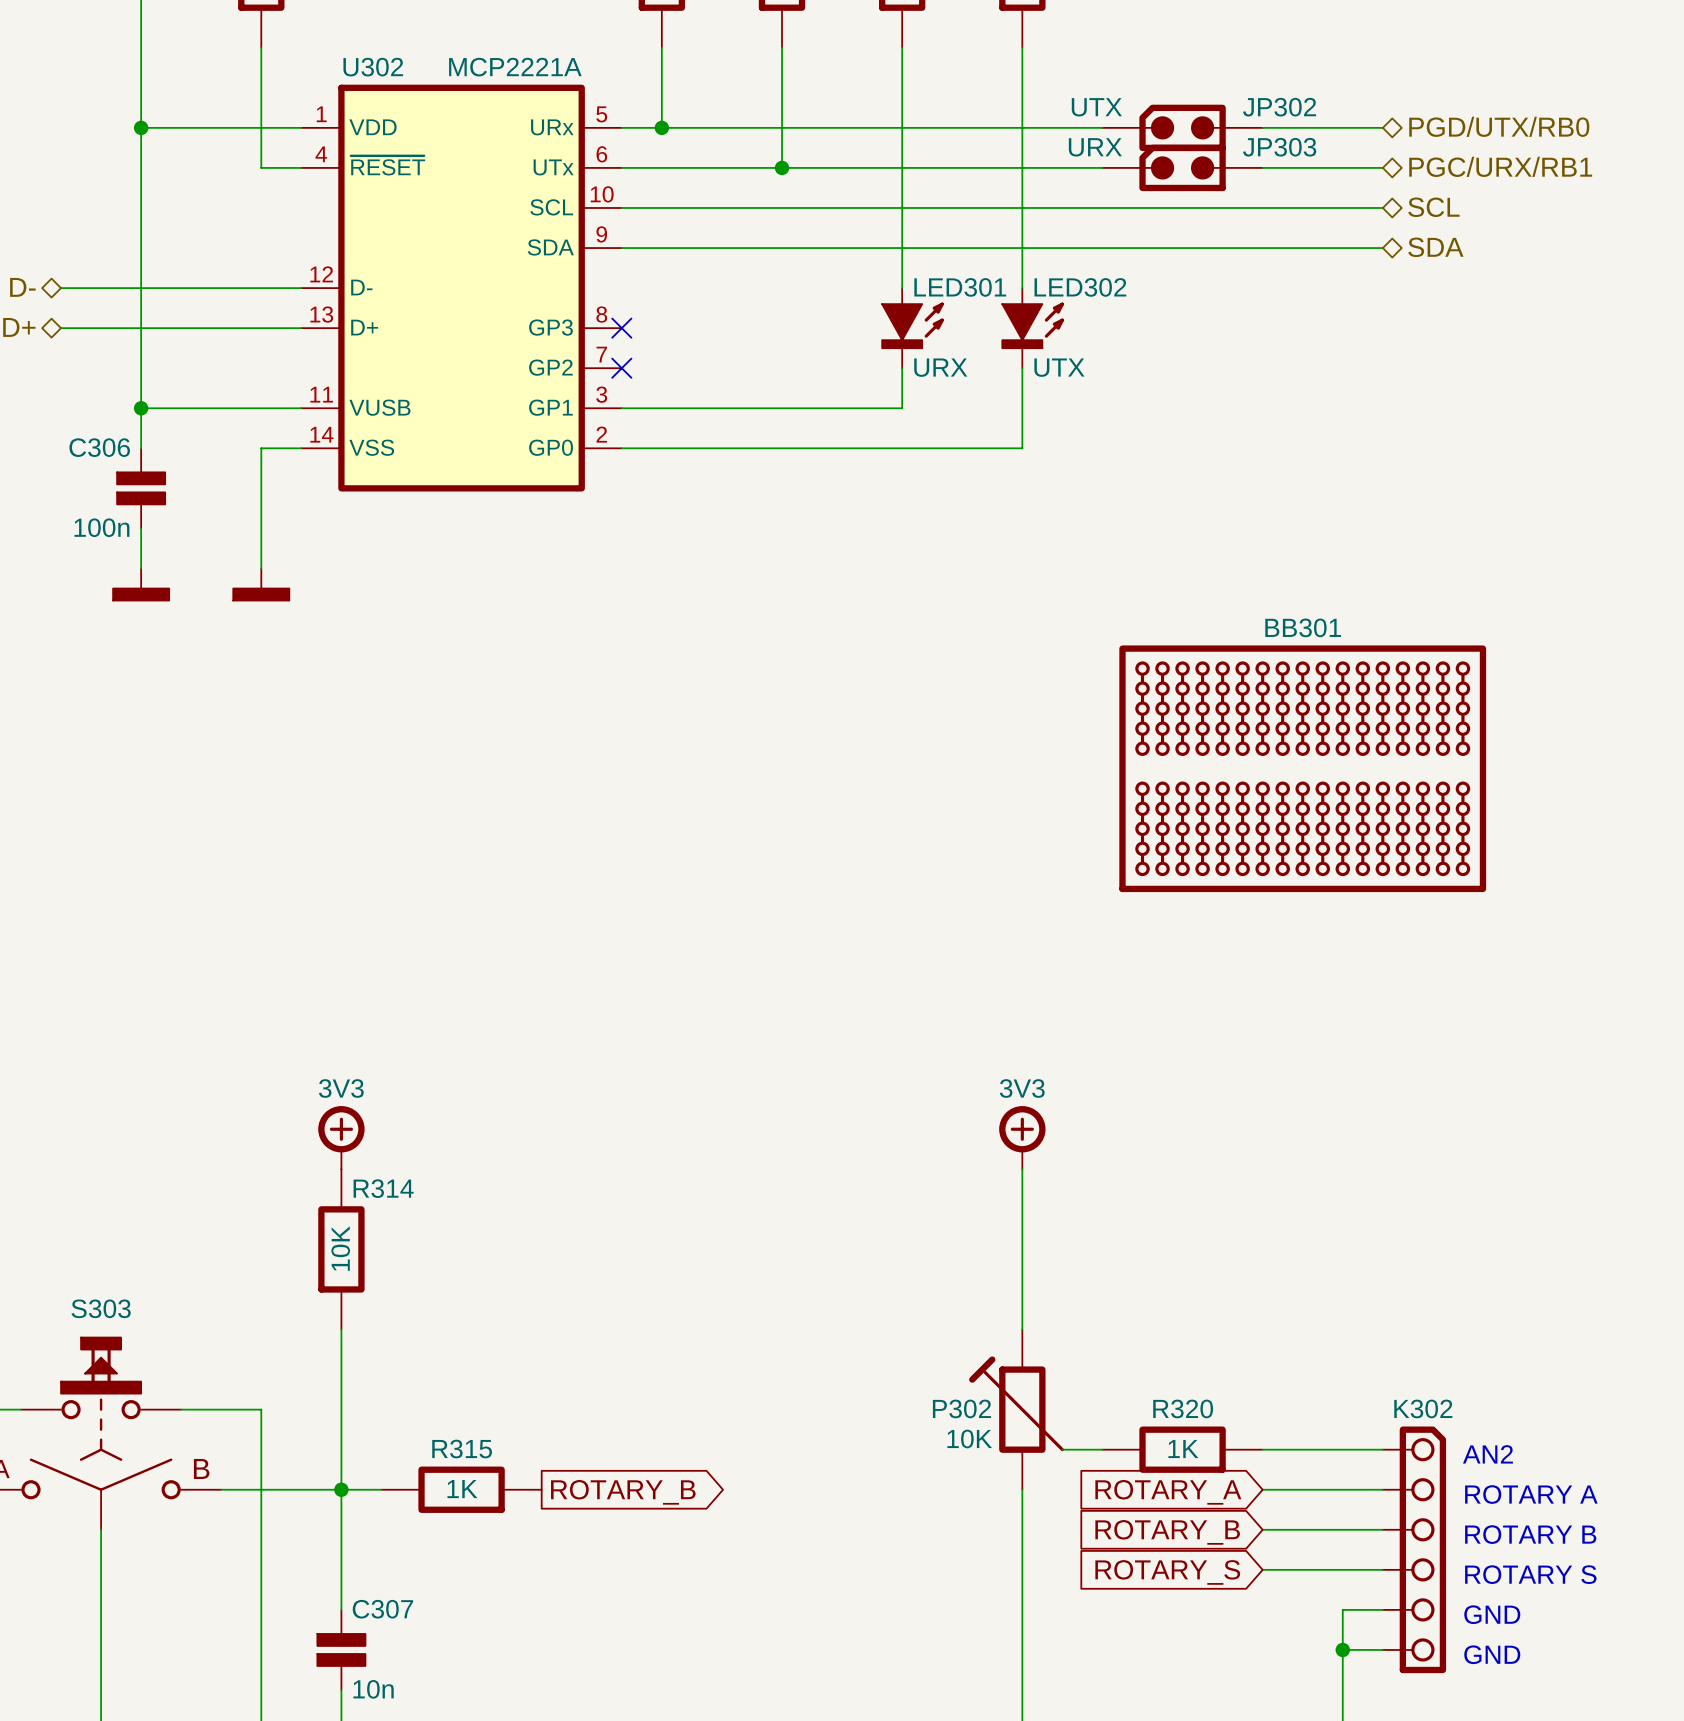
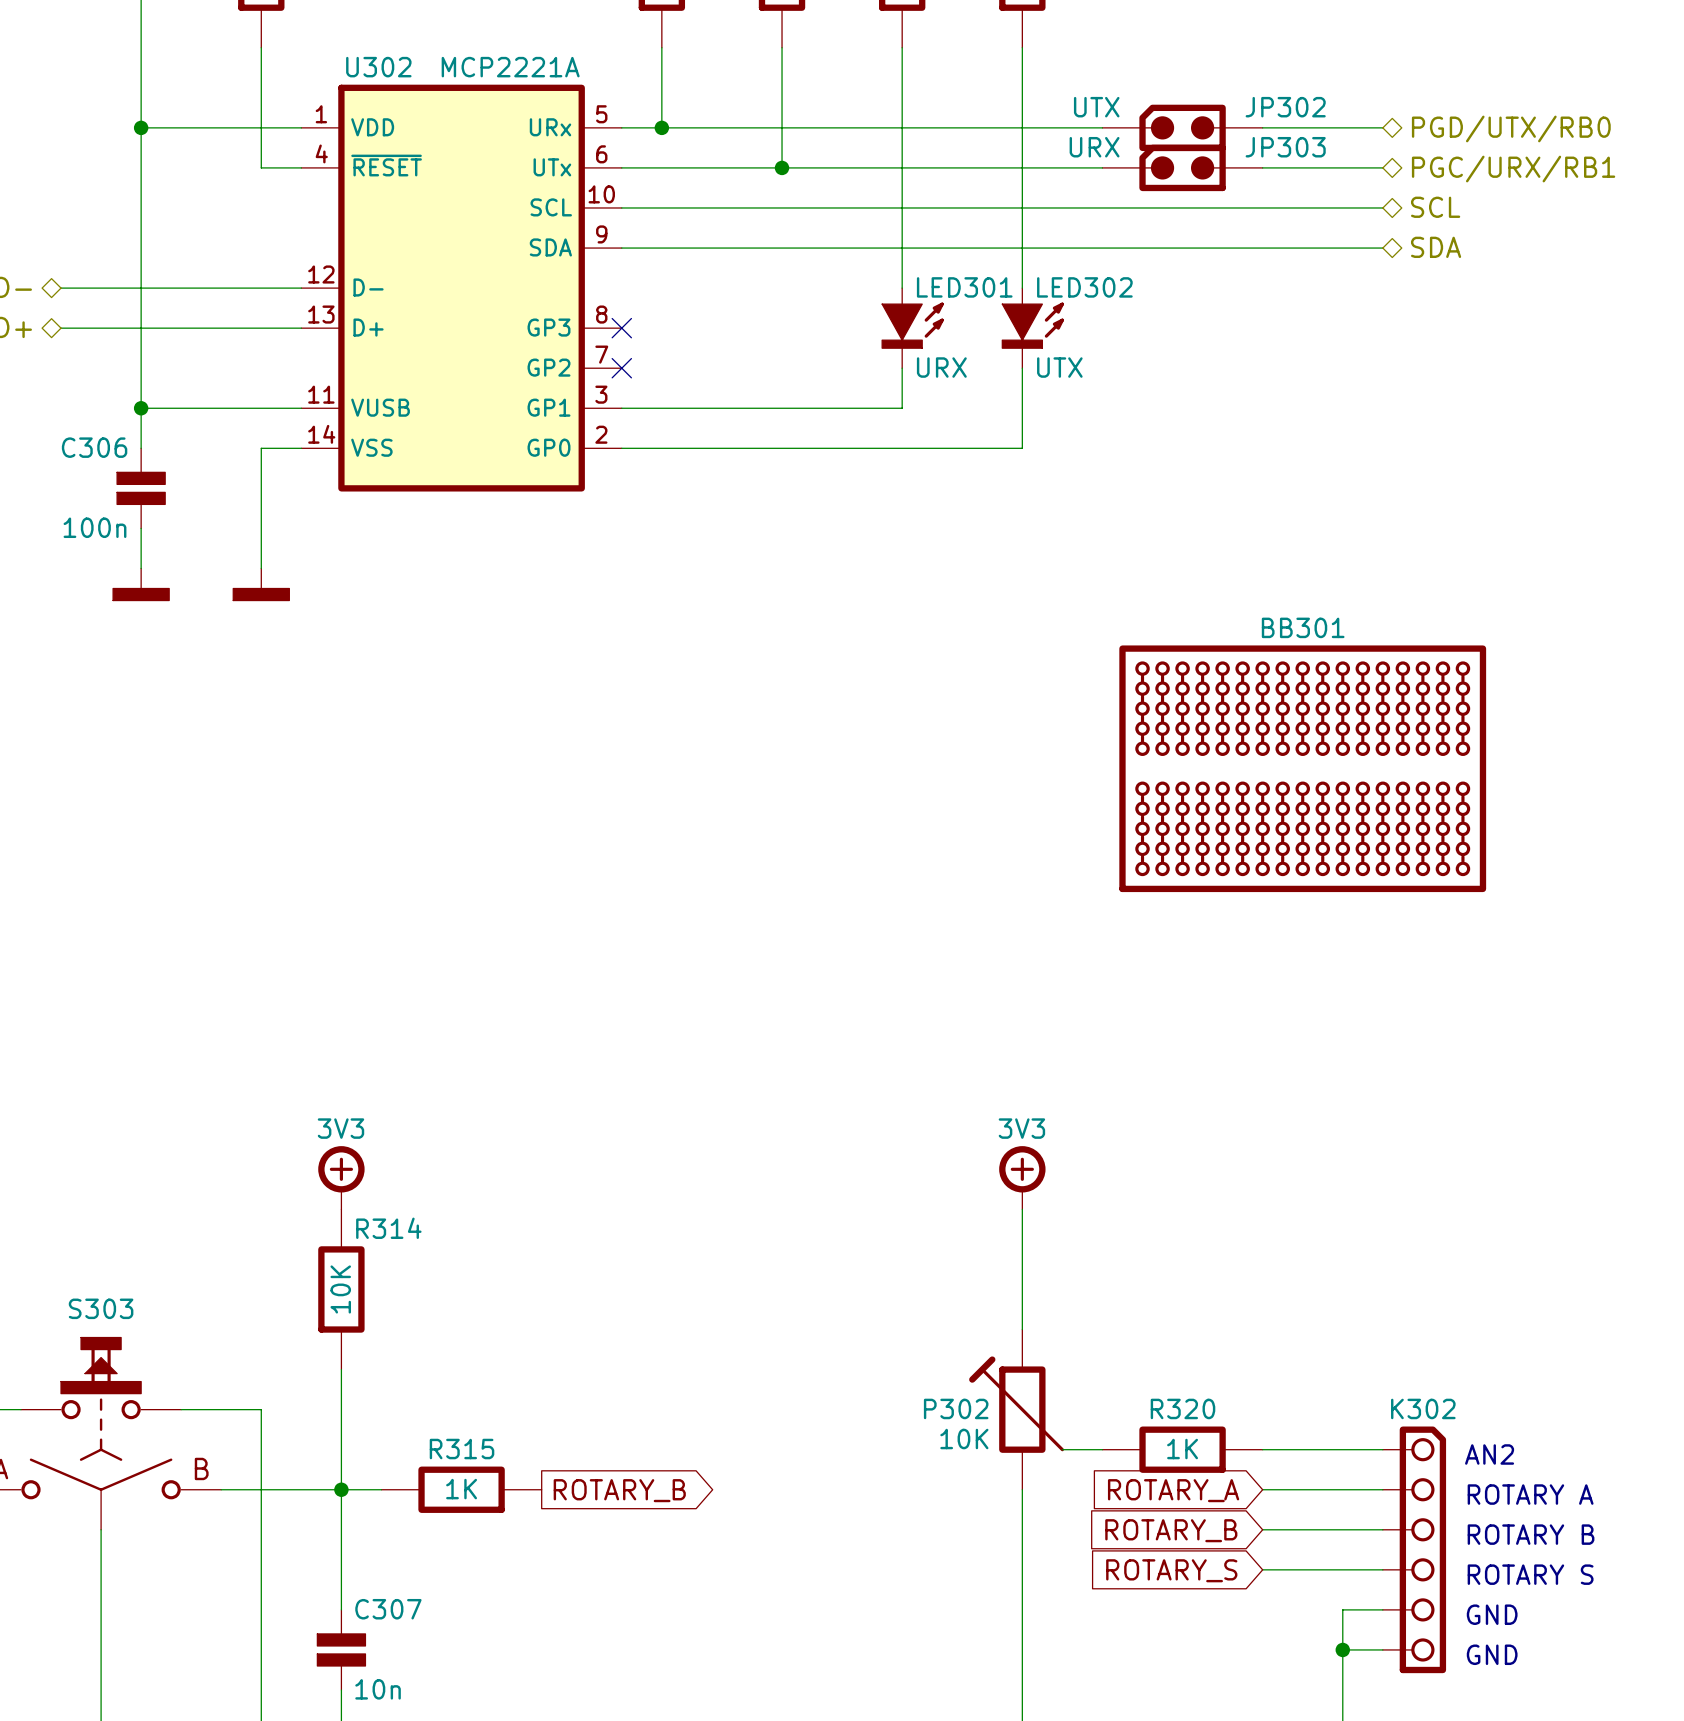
power symbol position: (341, 1137) -> (341, 1177)
power symbol position: (1022, 1137) -> (1022, 1177)
R314 position: (341, 1249) -> (341, 1289)

